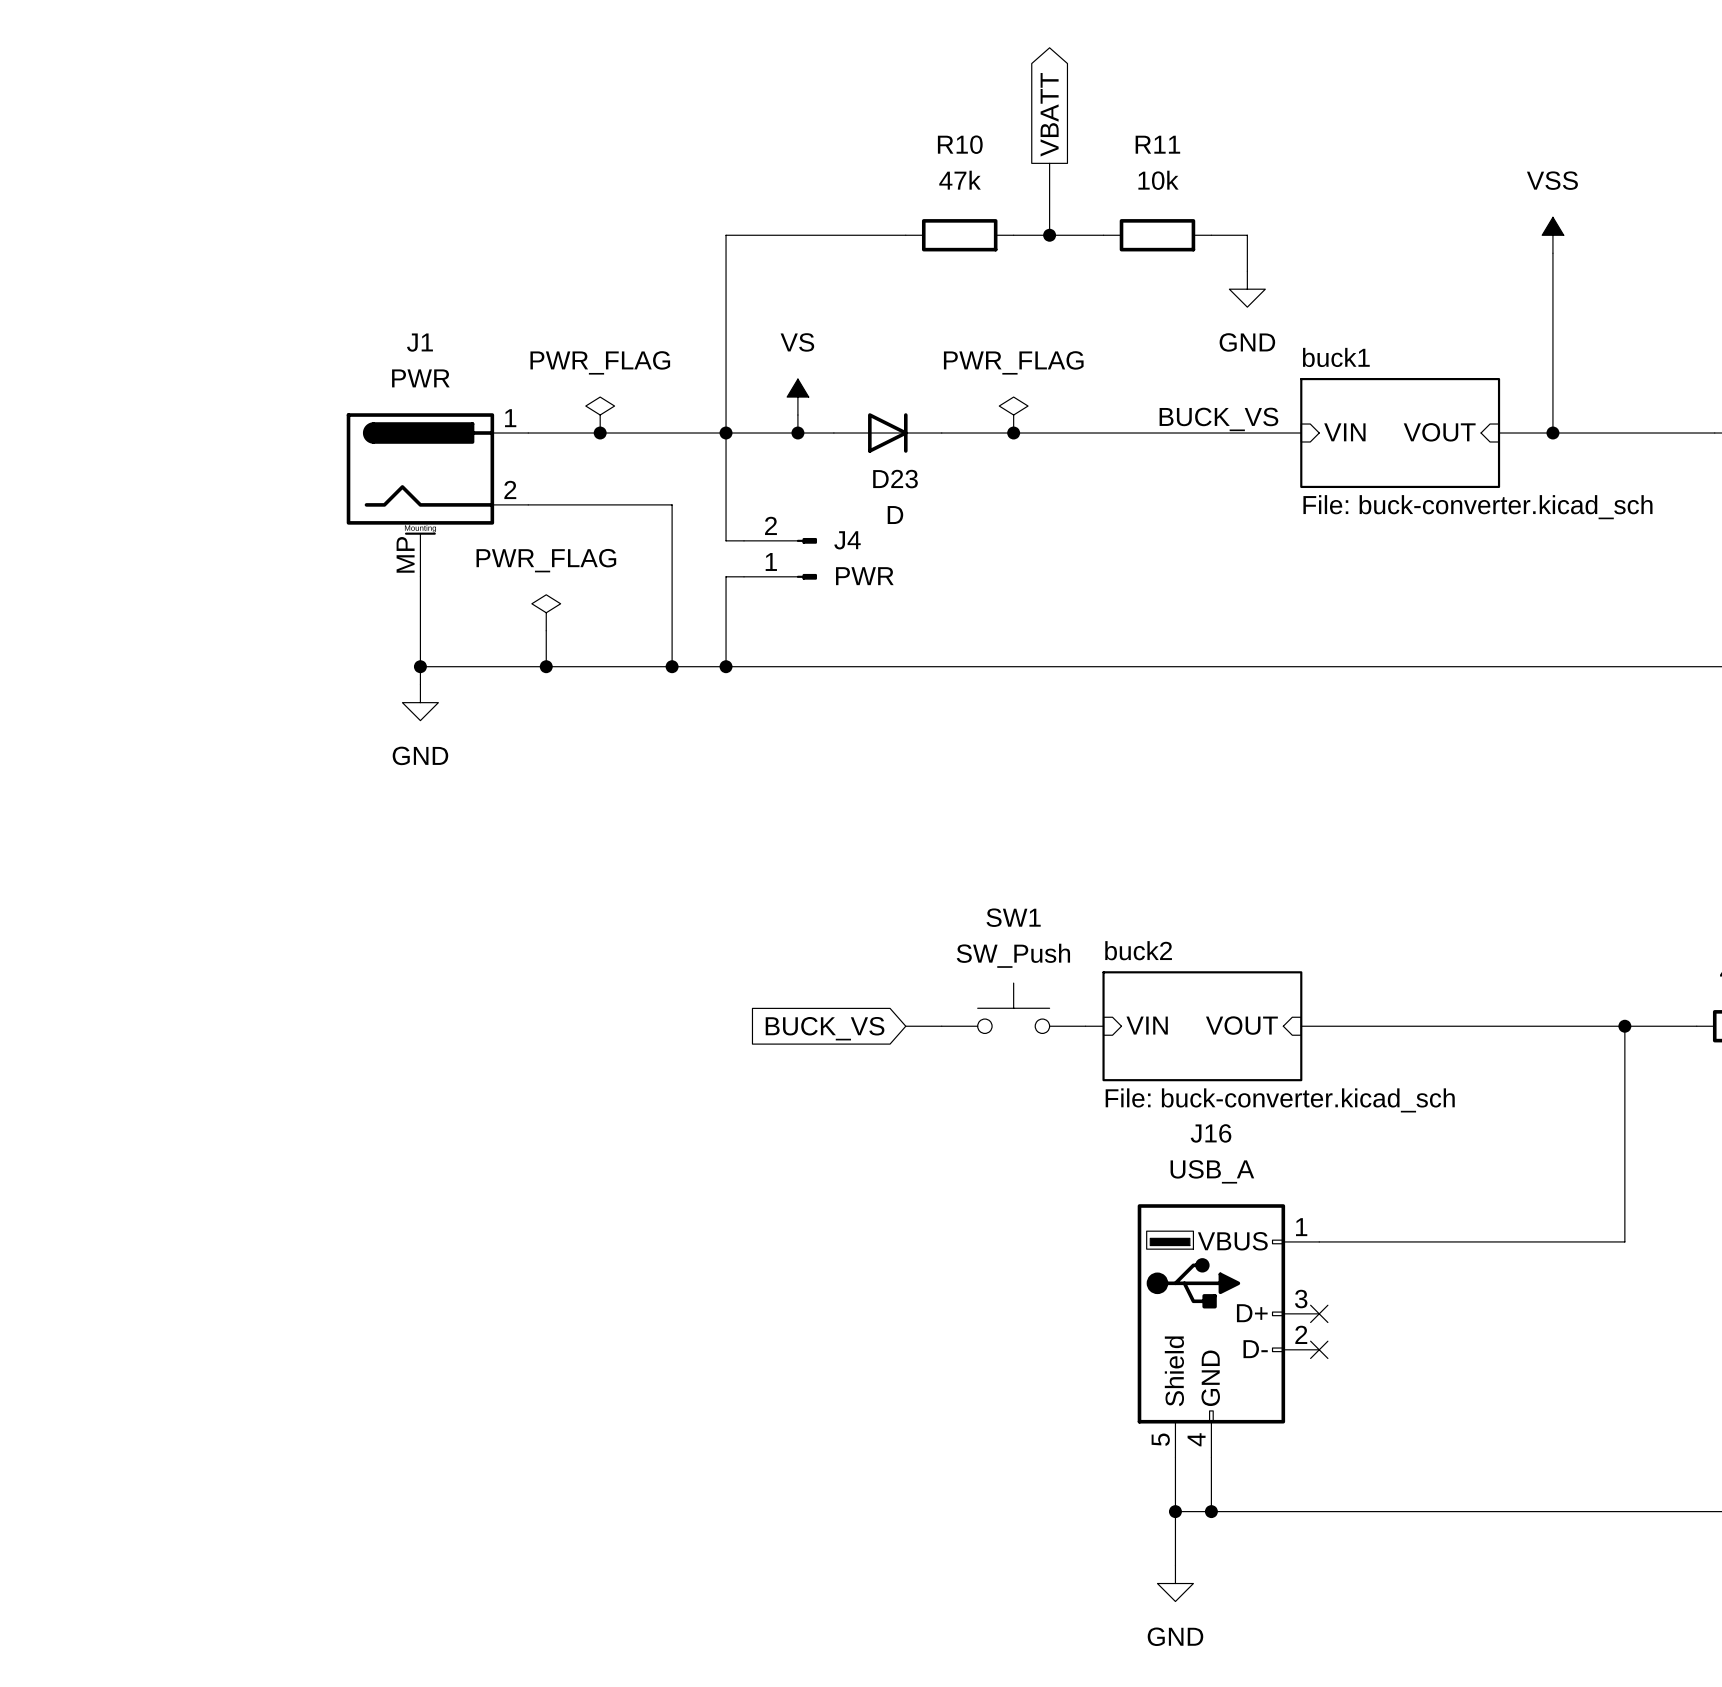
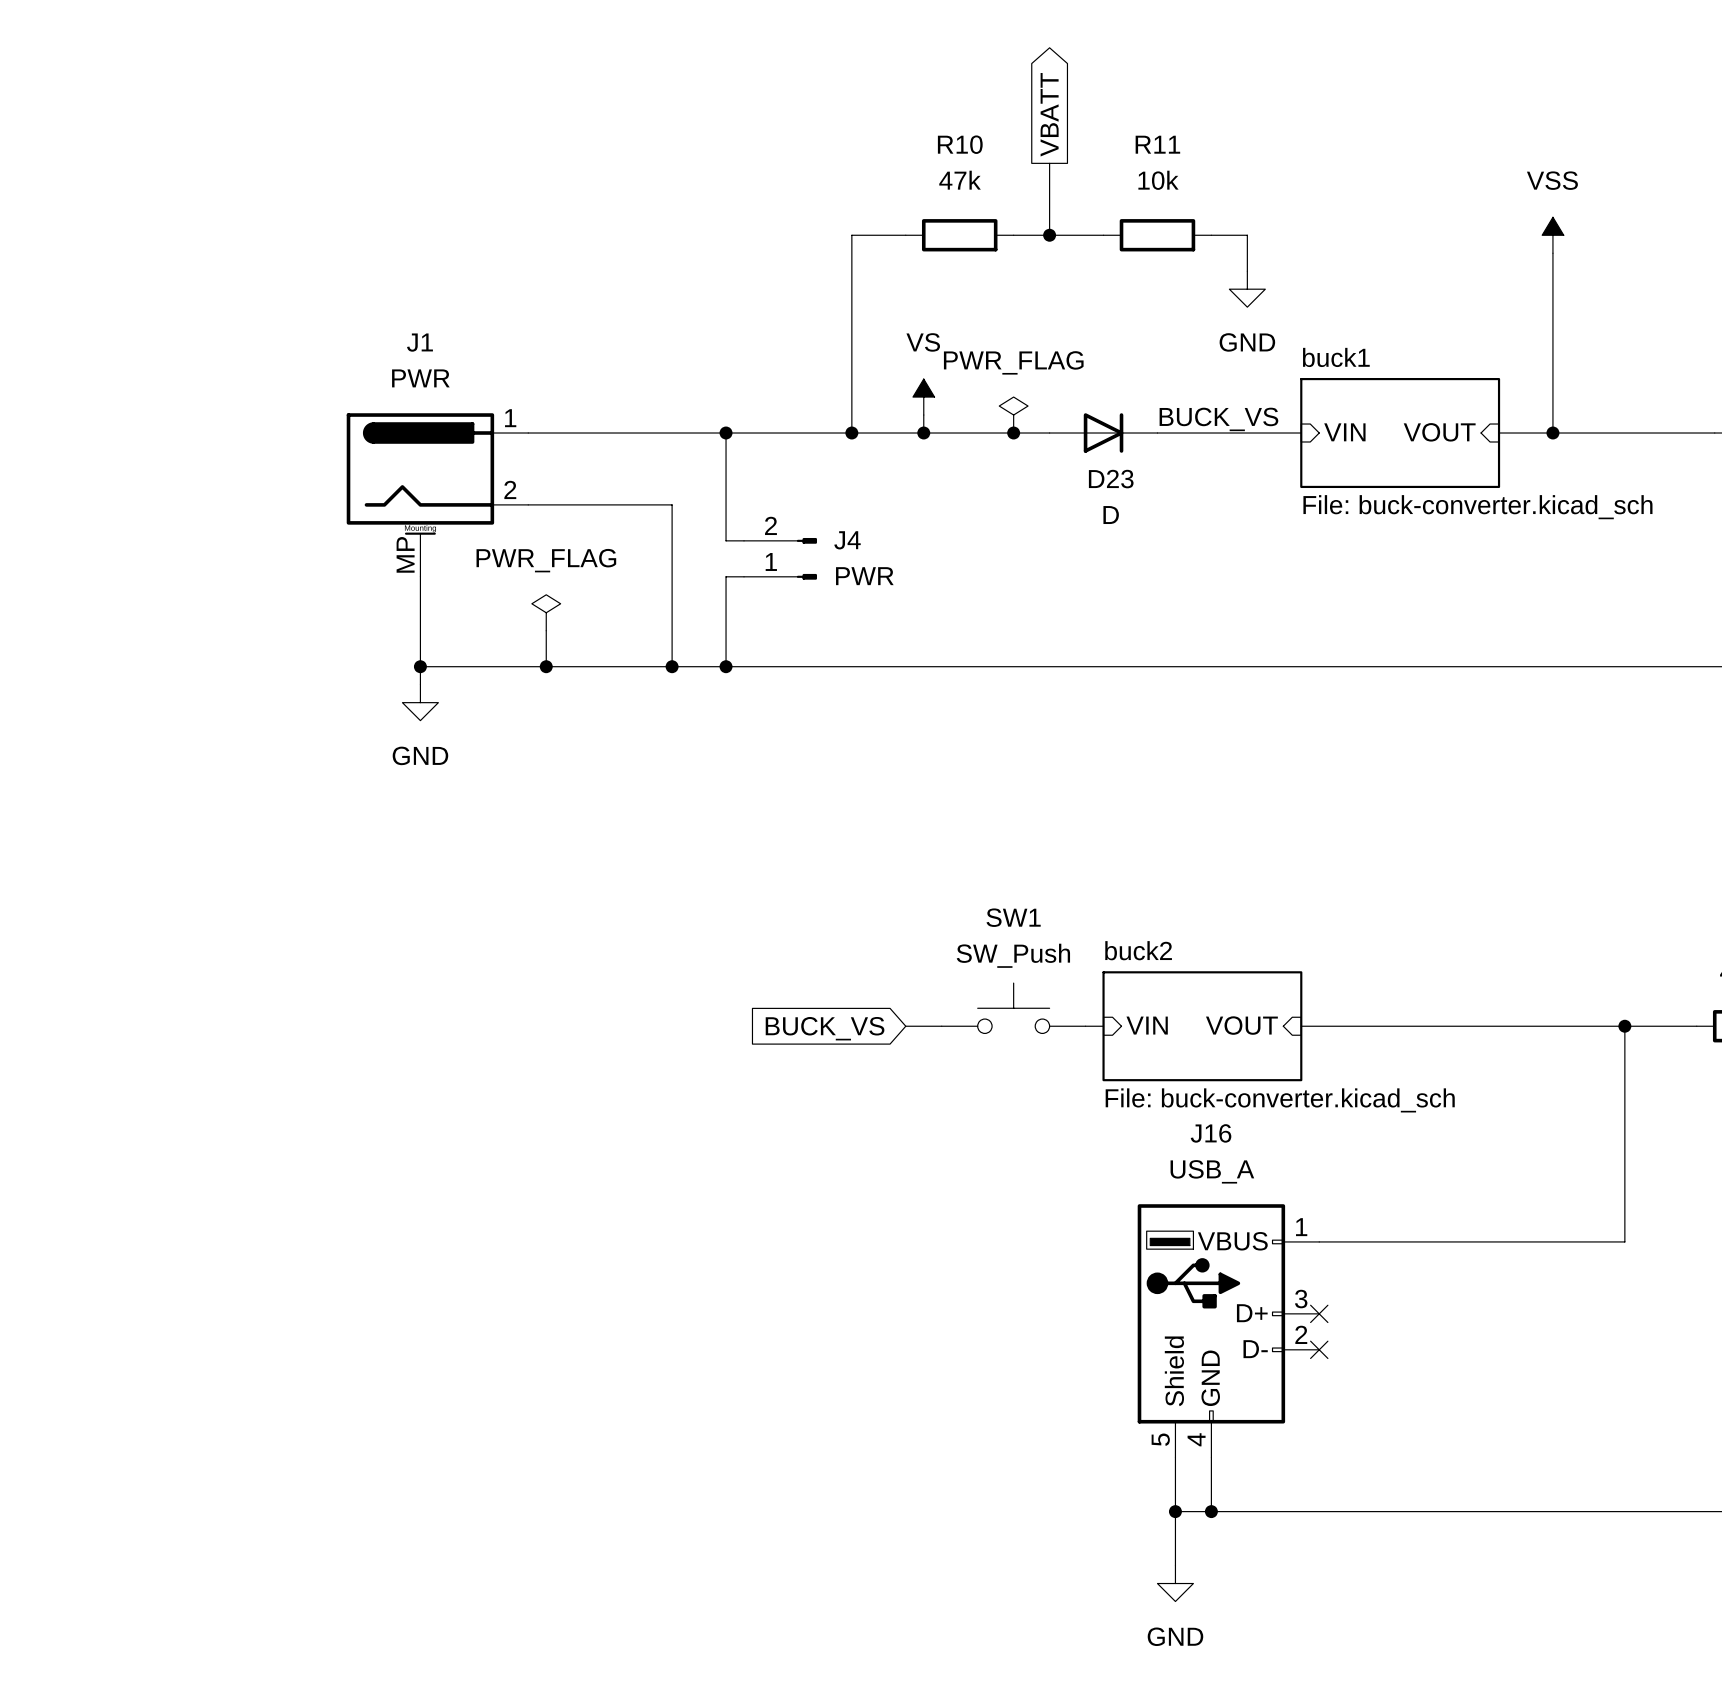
wire: (851, 235) (726, 235) (726, 433) -> (851, 235) (851, 433)
power symbol position: VS (797, 397) -> VS (923, 397)
power symbol: PWR_FLAG (600, 415) -> none
wire: (797, 415) (797, 433) -> (923, 415) (923, 433)
junction: (600, 433) -> none
junction position: (797, 433) -> (851, 433)
D23 position: (887, 433) -> (1103, 433)
junction: none -> (923, 433)

